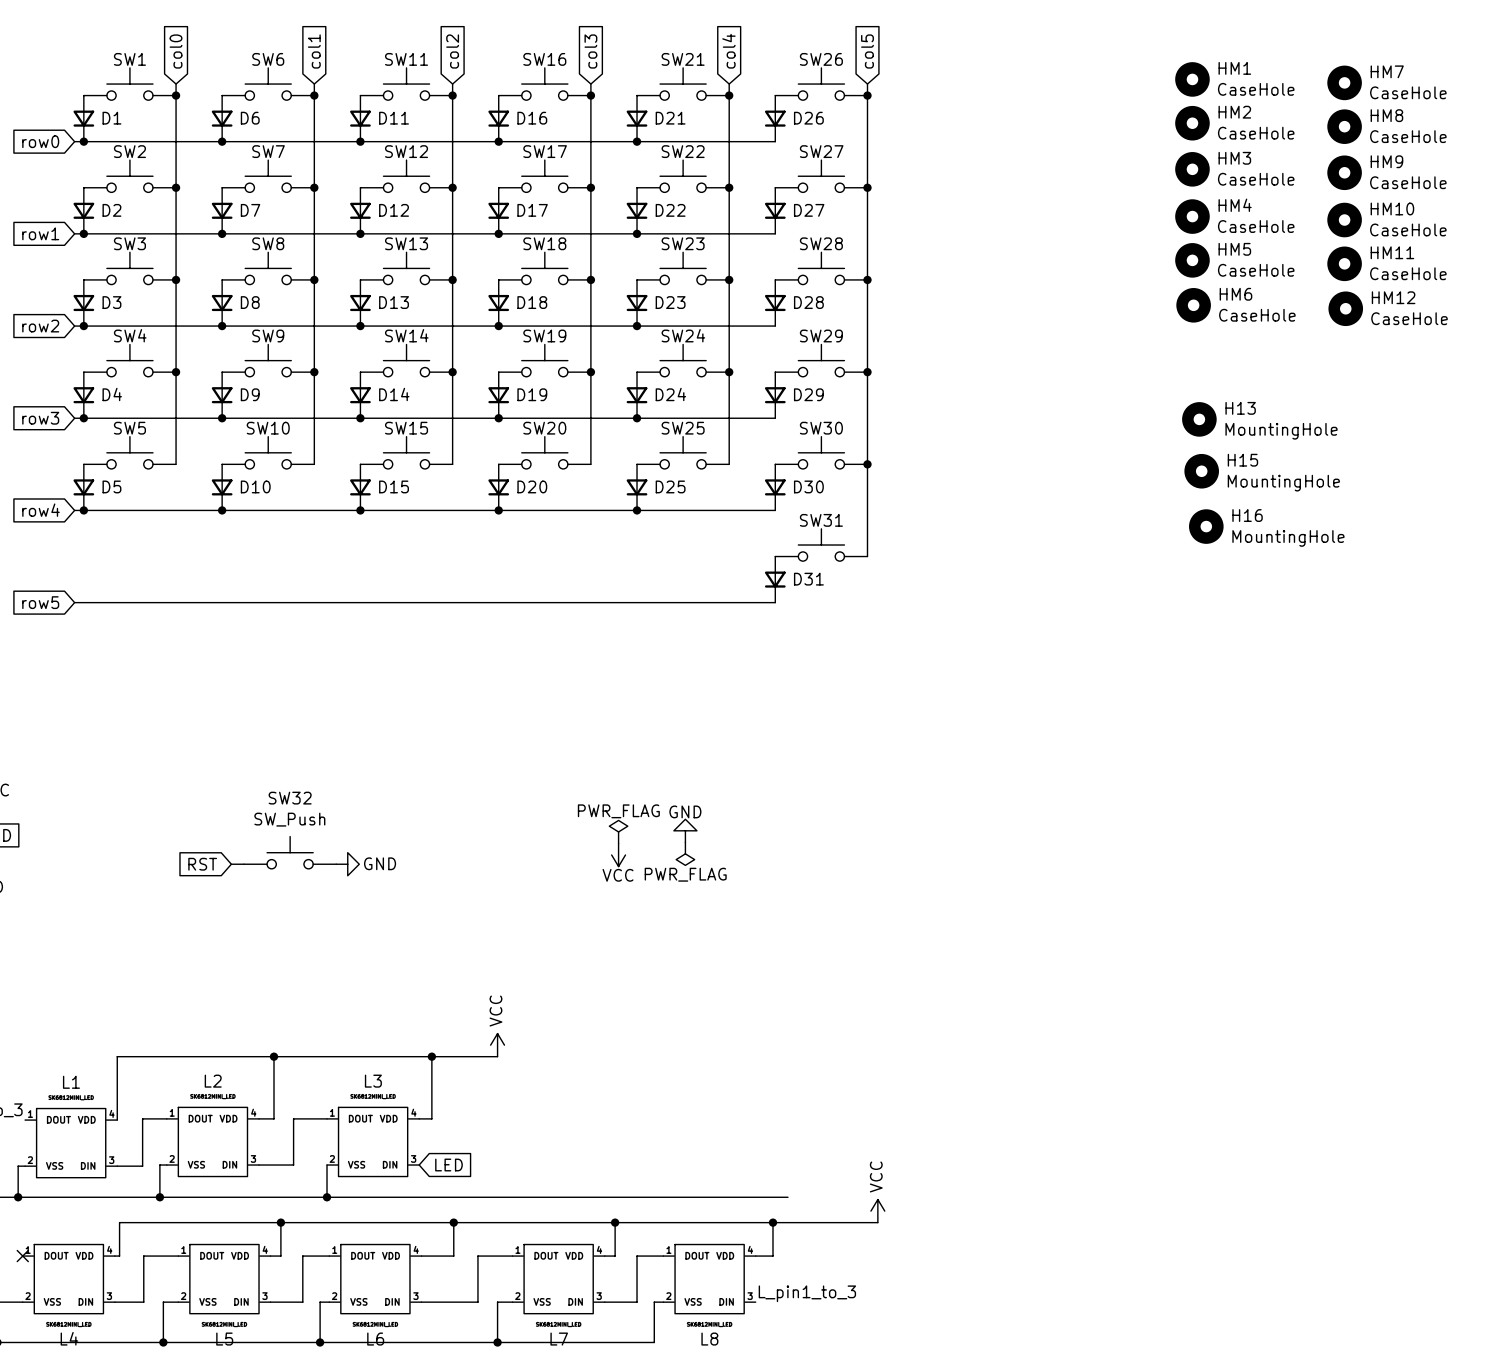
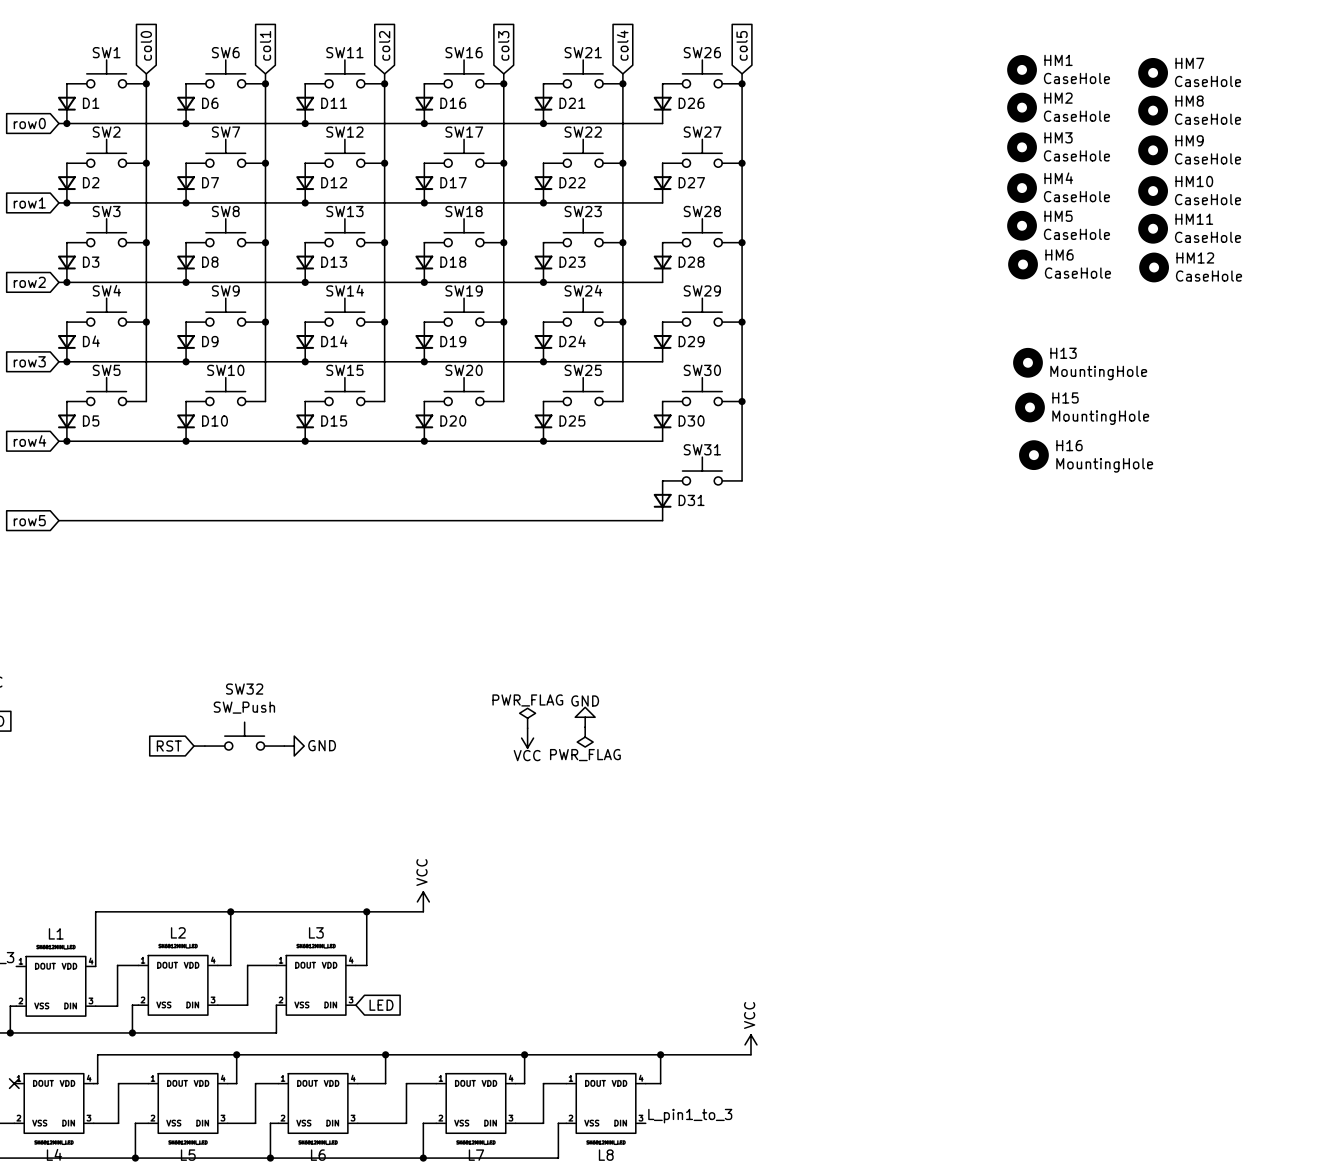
wire: (327, 1197) (787, 1197) -> none
junction: (327, 1197) -> none

